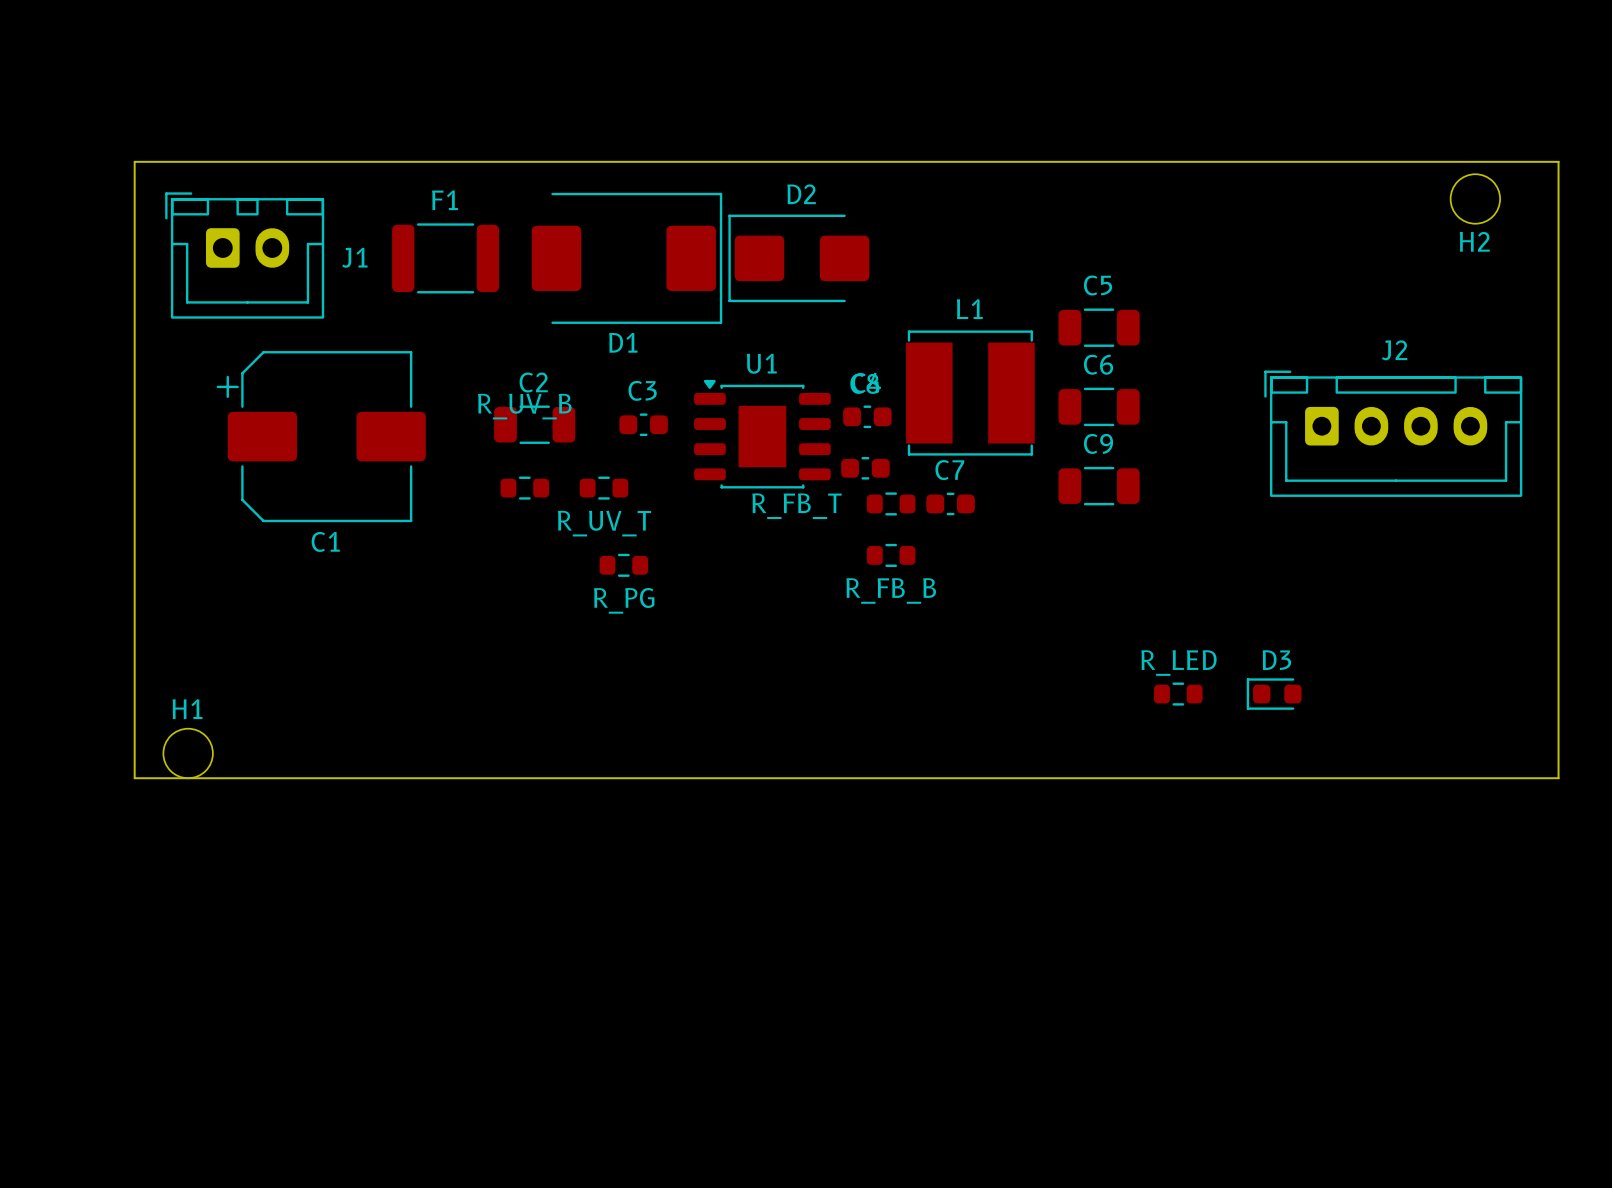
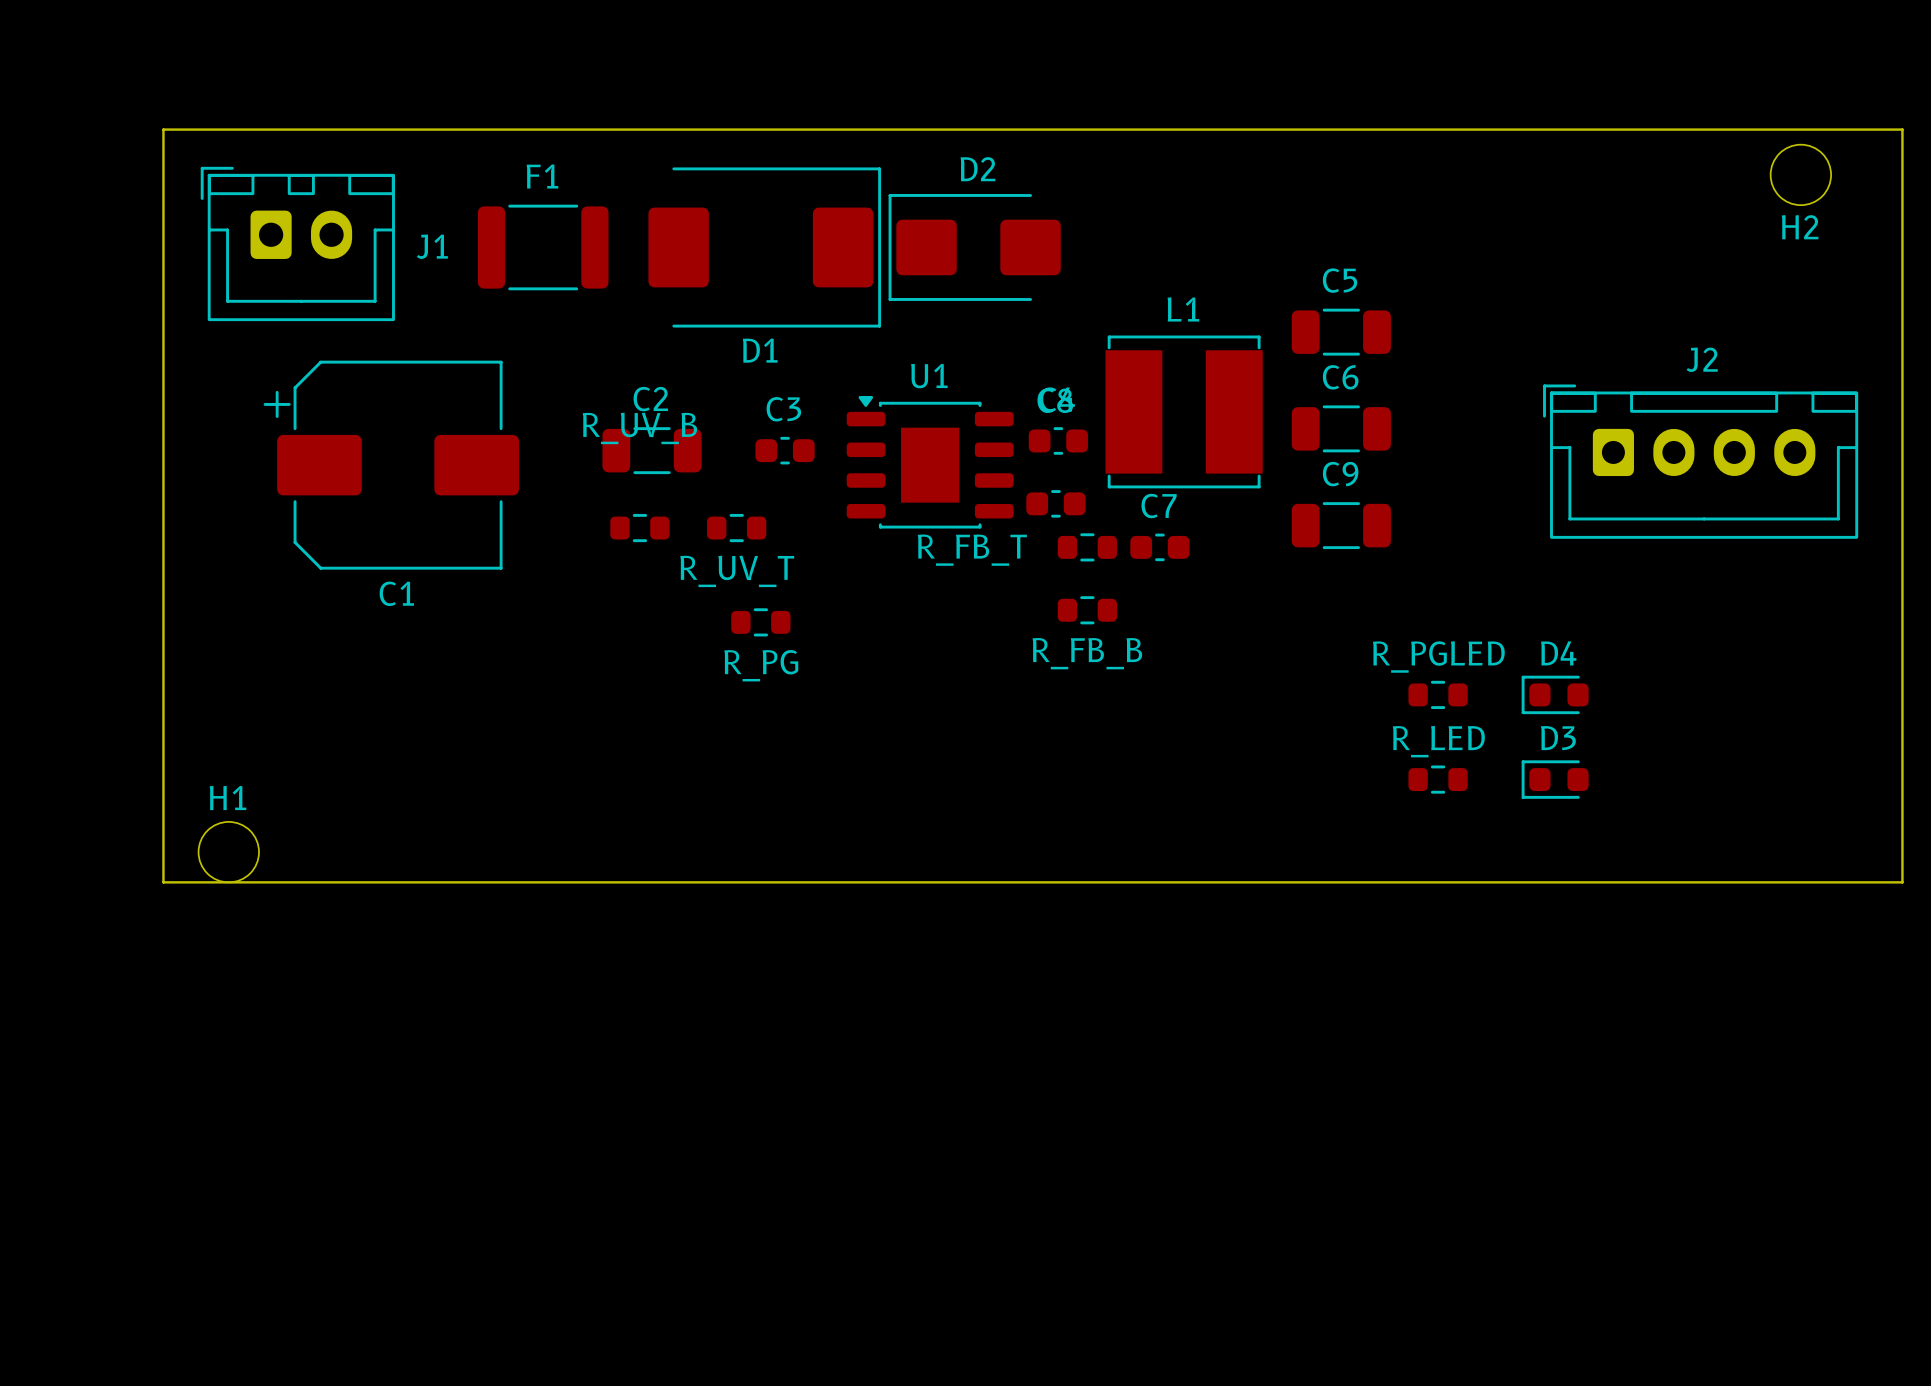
R_PGLED: none -> (1438, 694)
D4: none -> (1555, 694)

